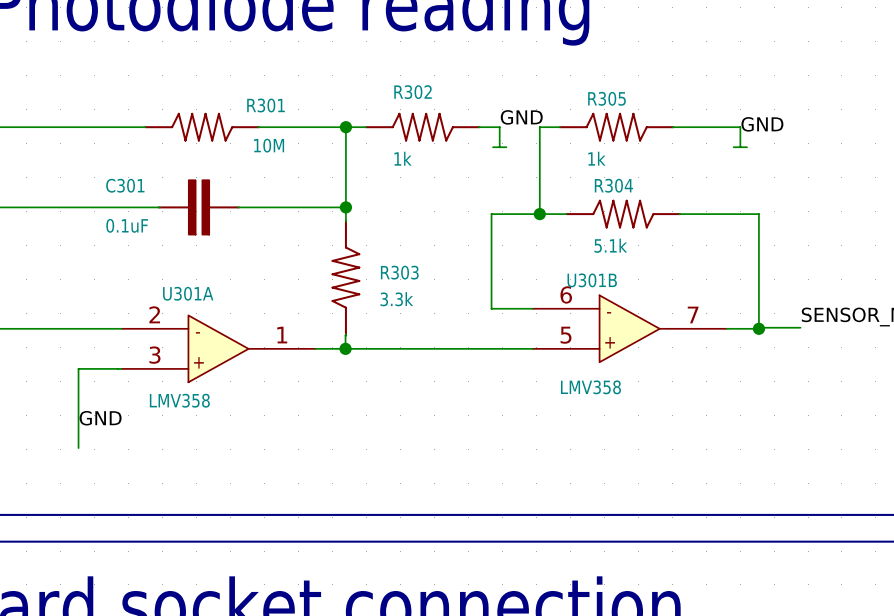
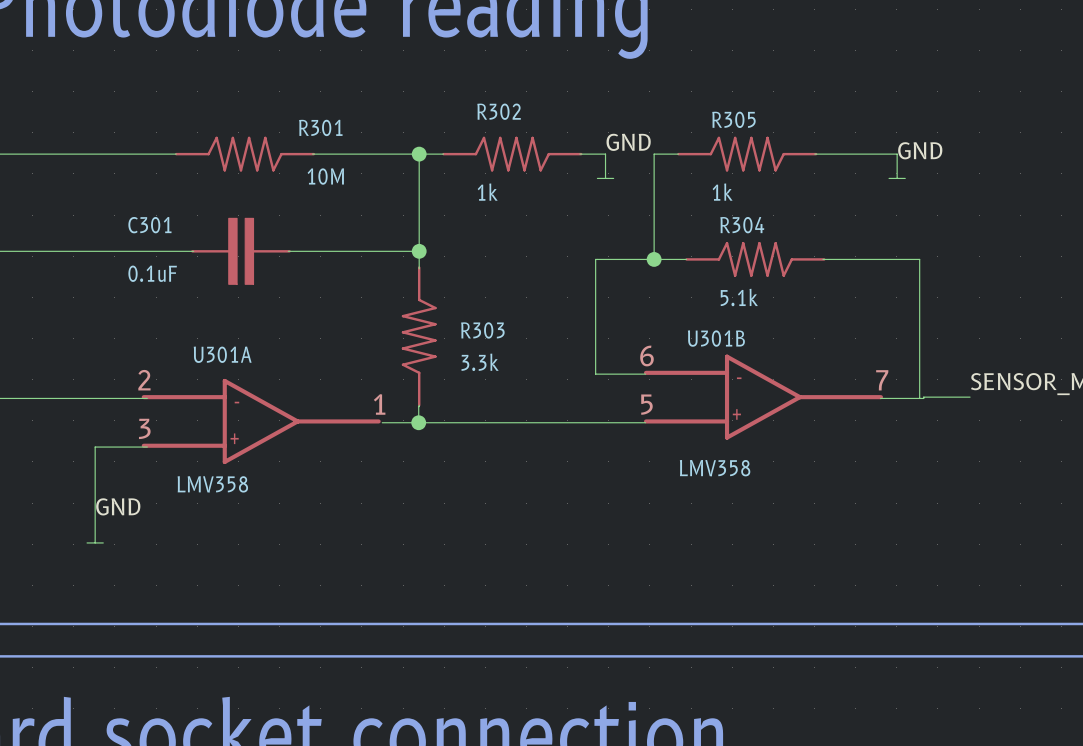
U301B symbol: [532, 295, 727, 363] -> [643, 354, 884, 440]
U301A symbol: [121, 315, 316, 383] -> [141, 378, 381, 465]
junction: (758, 328) -> none
wire: none -> (87, 542) (103, 542)

